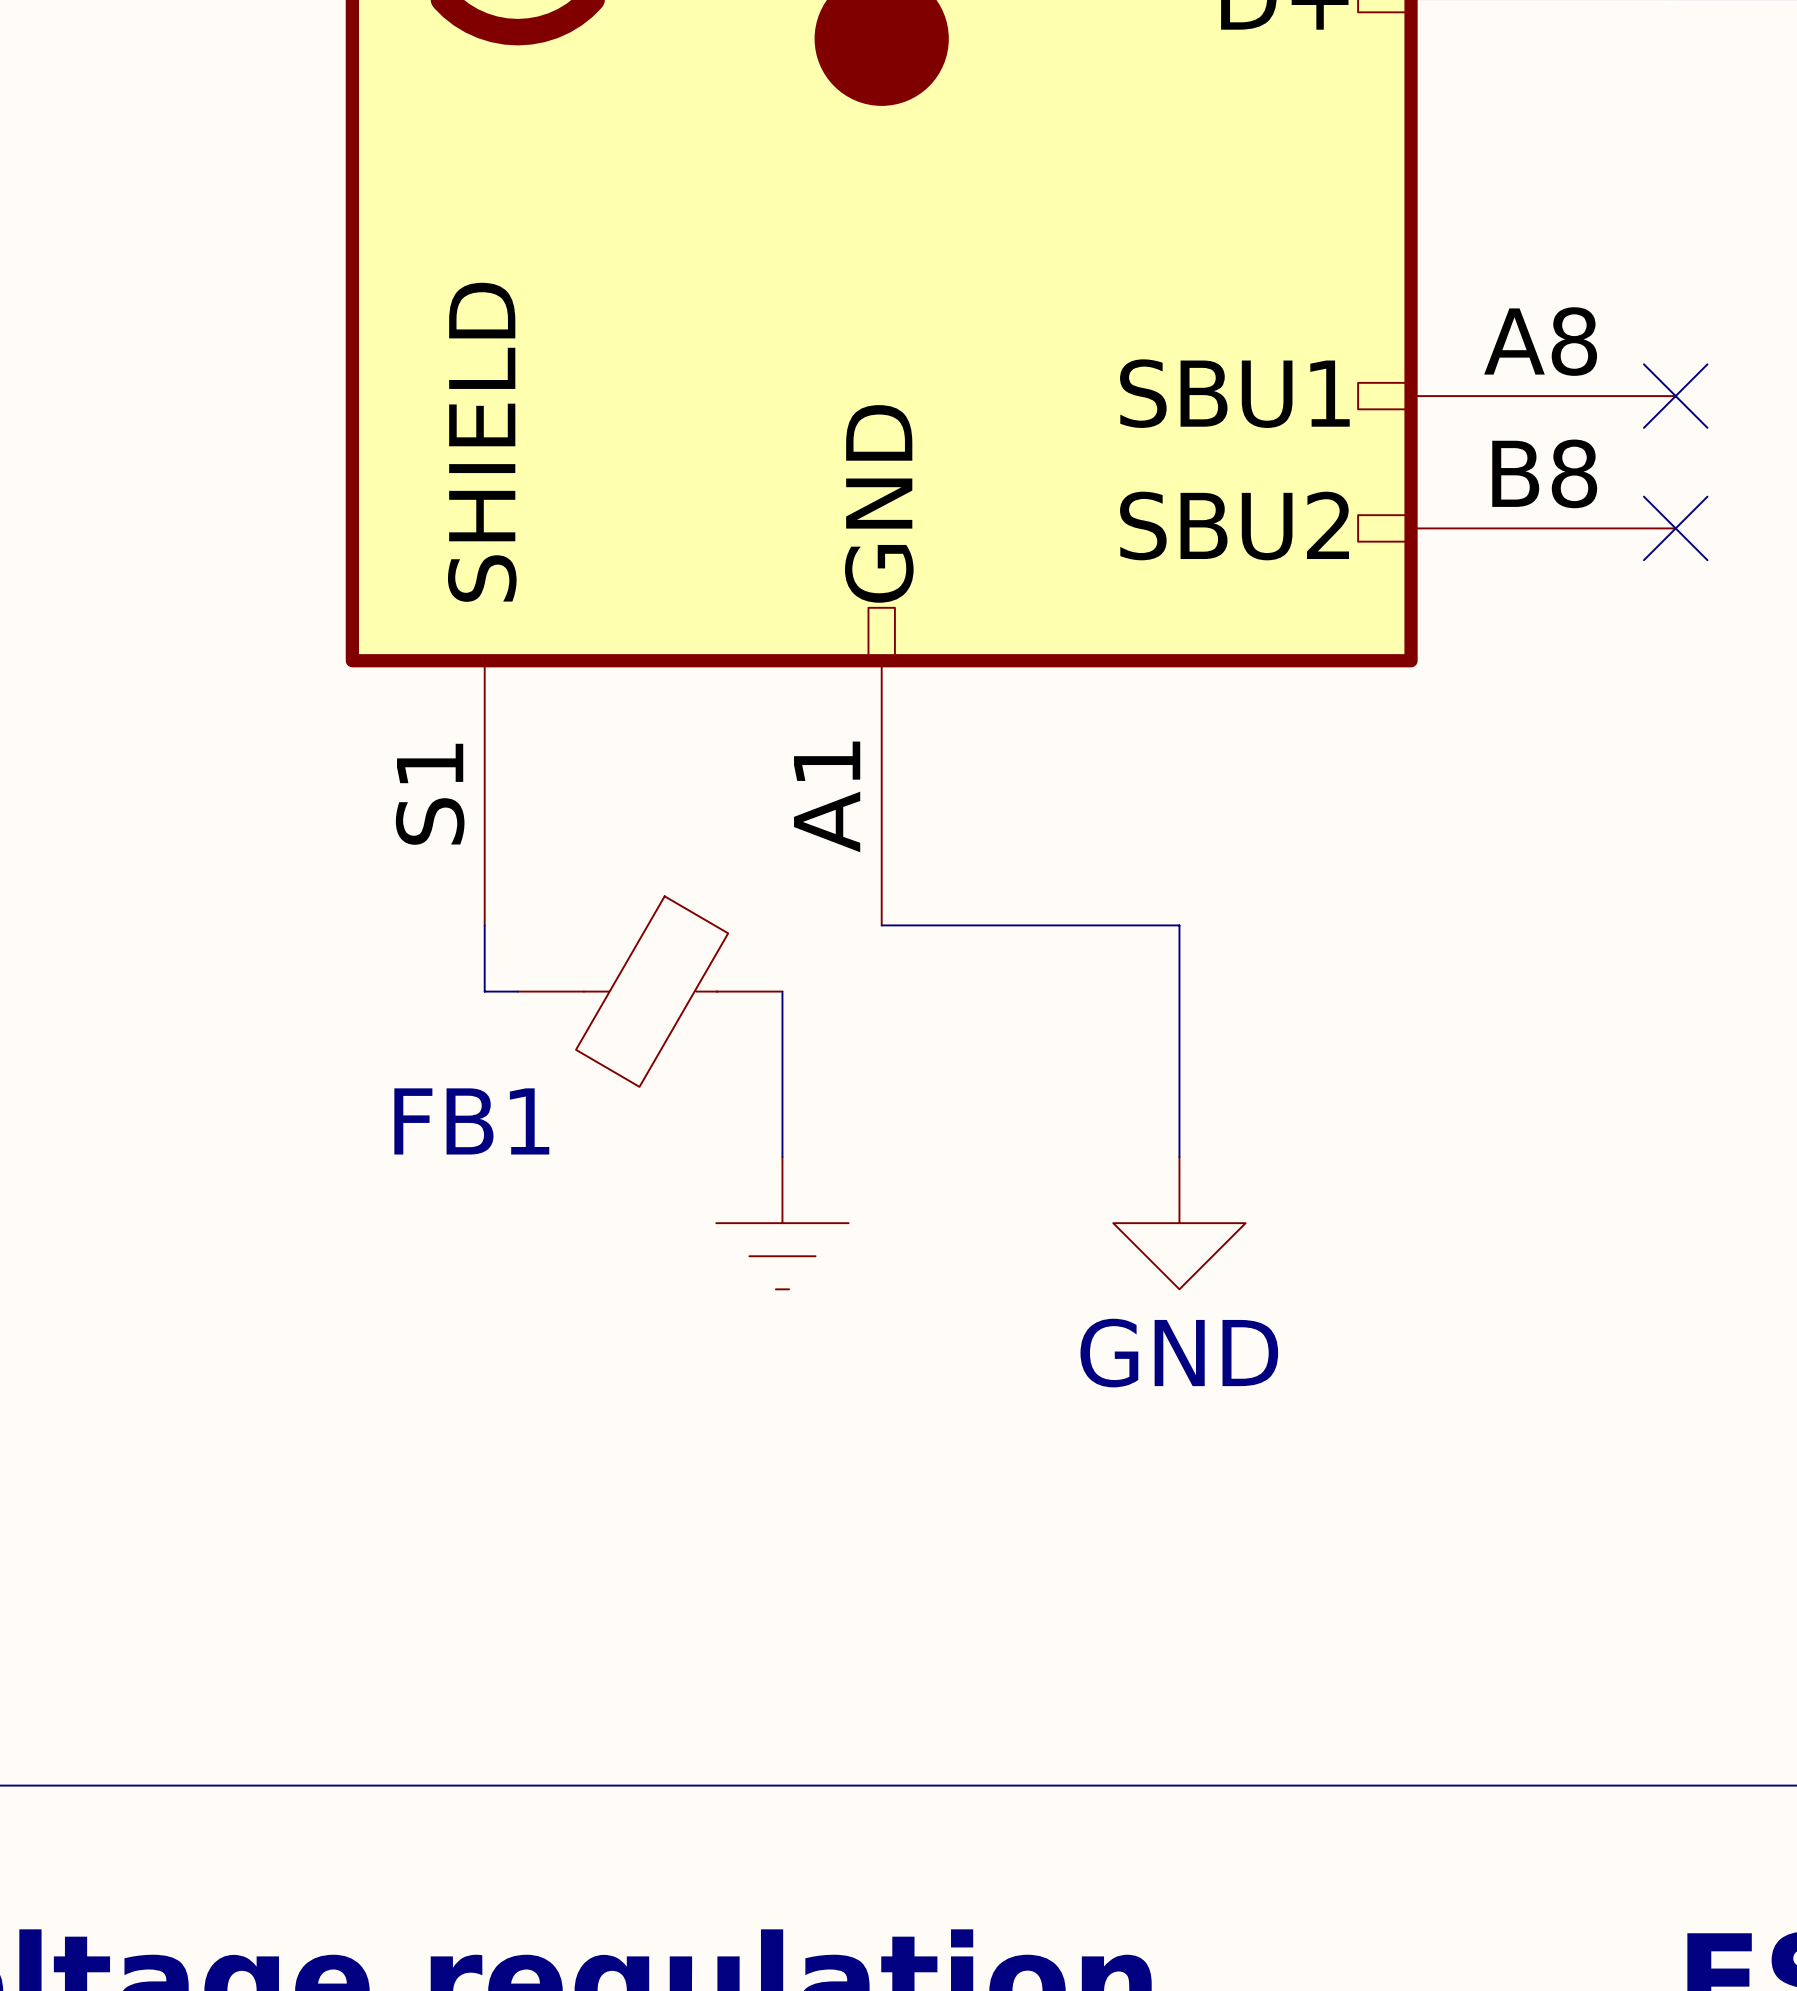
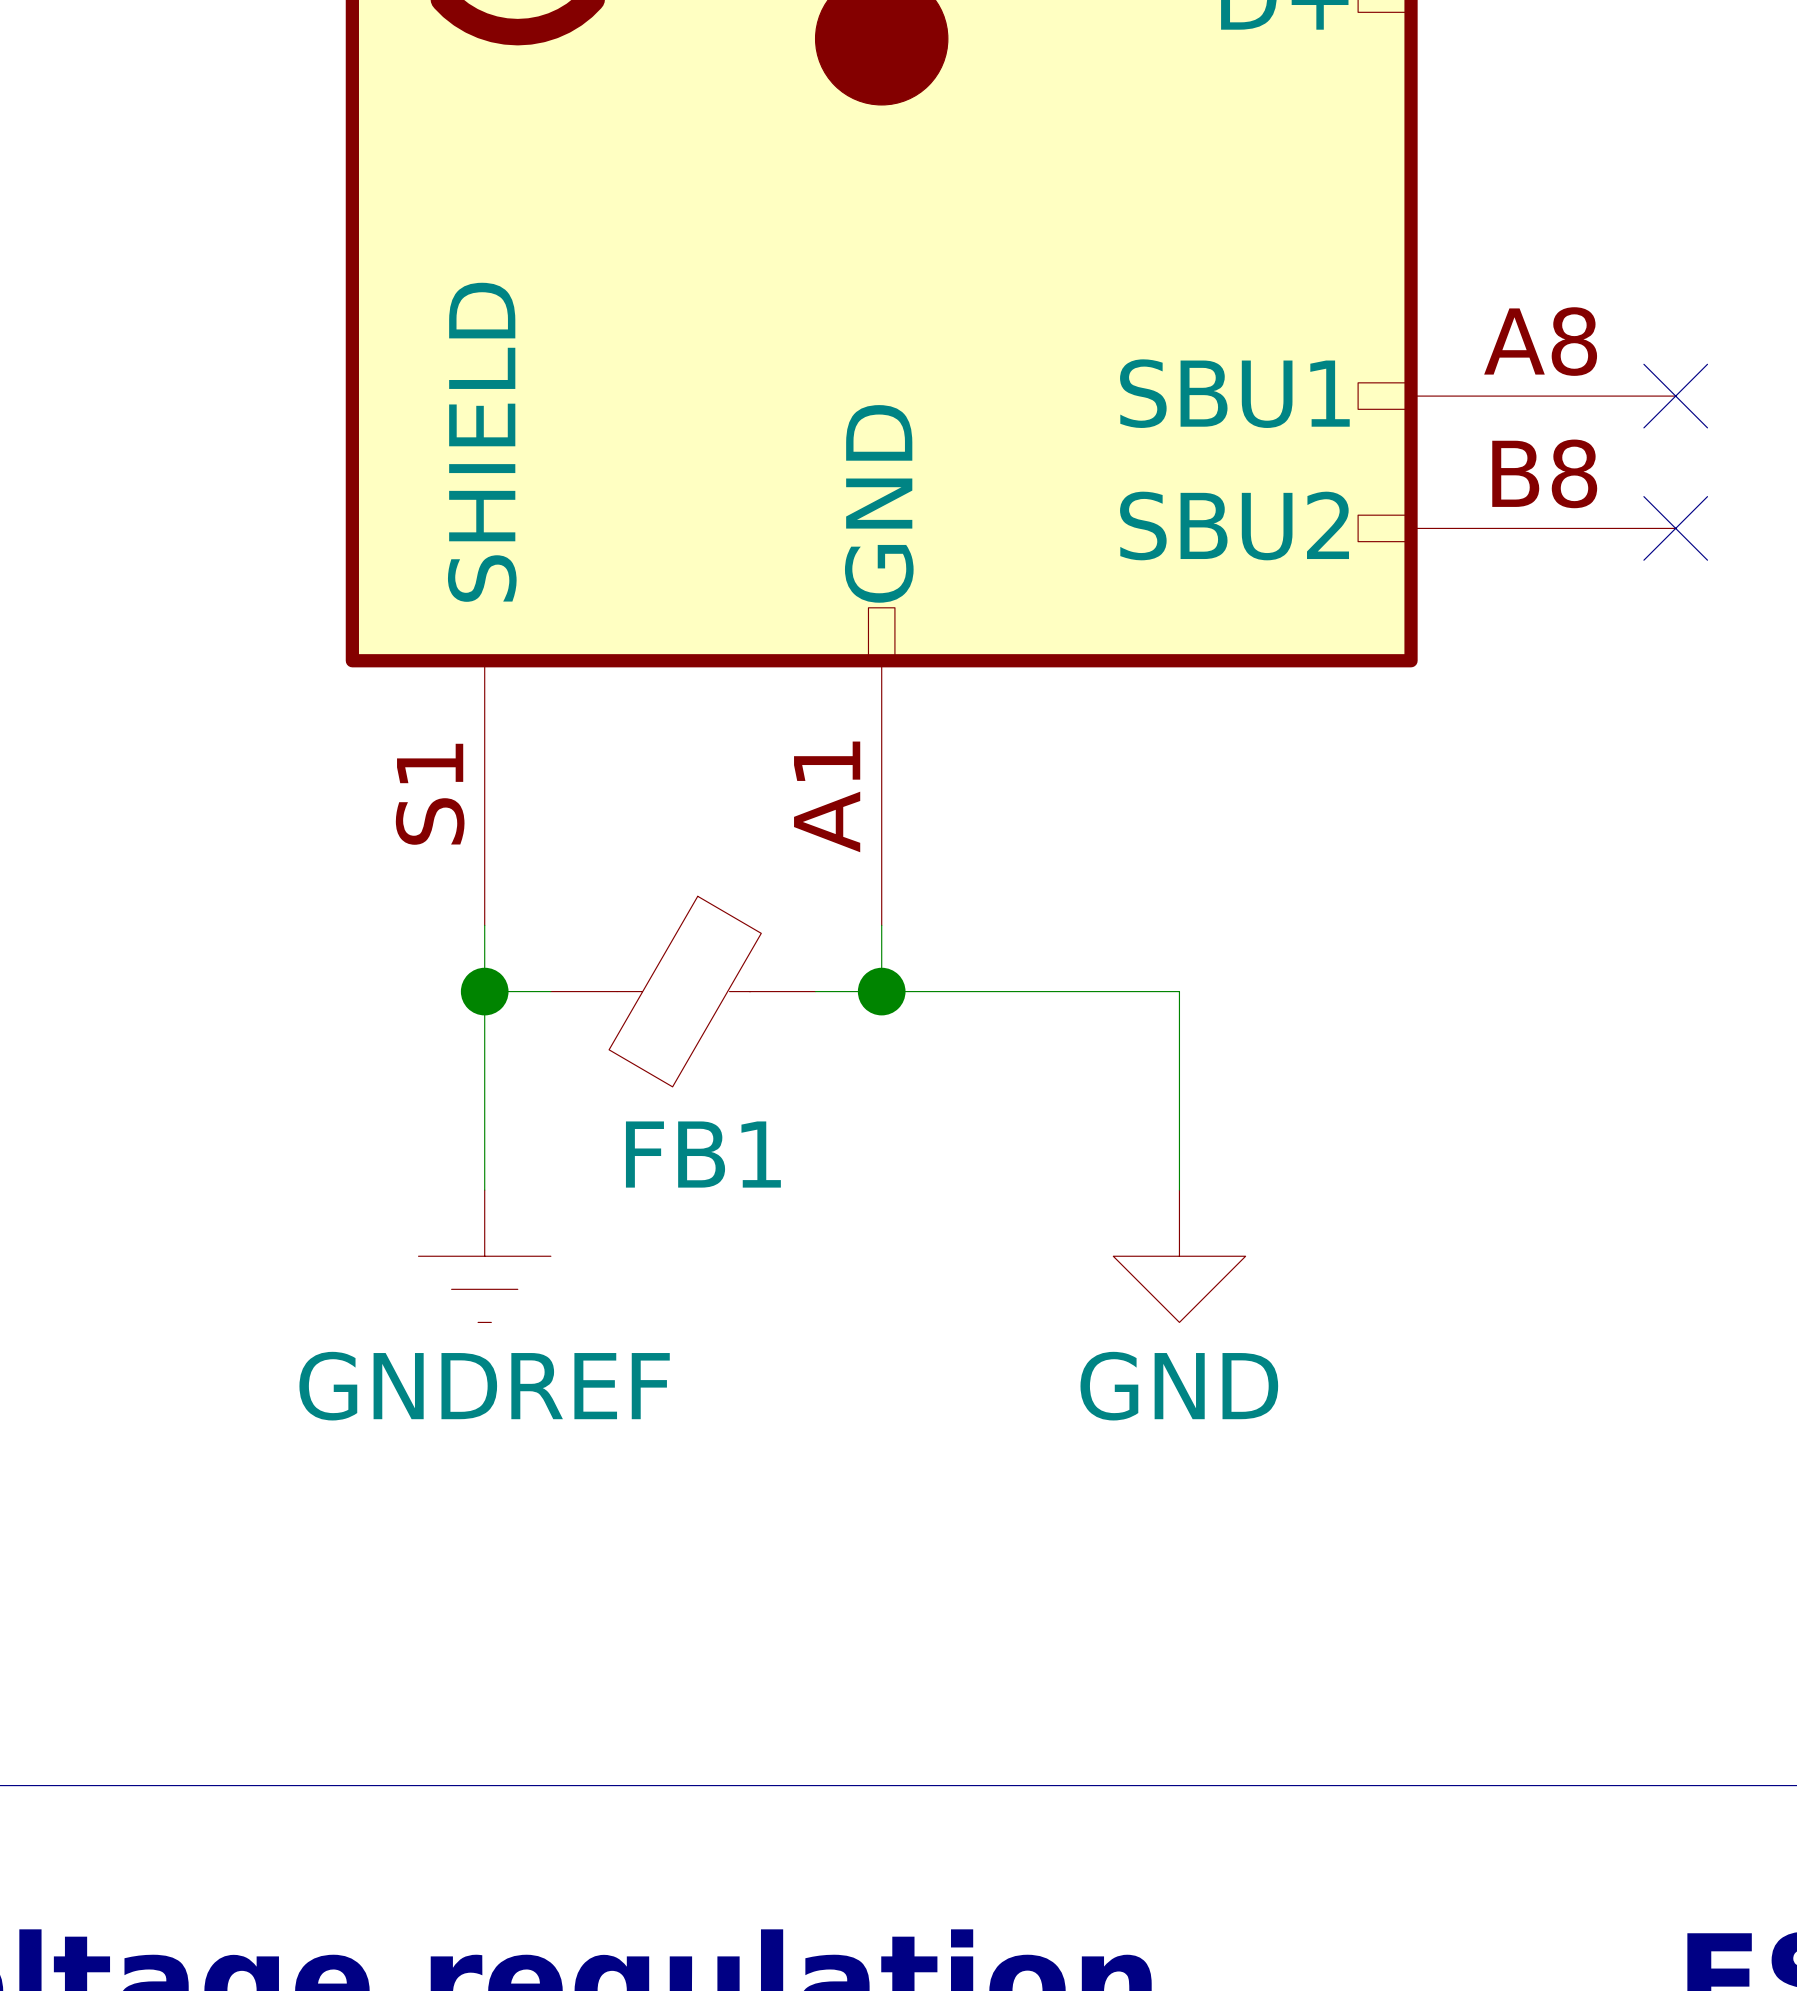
wire: (881, 925) (1179, 925) (1179, 991) -> (815, 991) (1179, 991)
wire: none -> (881, 925) (881, 991)
wire: none -> (484, 991) (484, 1190)
junction: none -> (484, 991)
FB1 position: (650, 991) -> (683, 991)
wire: (782, 991) (782, 1157) -> none
junction: none -> (881, 991)
FB1 name position: FB1 (471, 1121) -> FB1 (703, 1154)
power symbol: (782, 1223) -> none
power symbol position: GND (1179, 1223) -> GND (1179, 1256)
power symbol: none -> GNDREF (484, 1256)

